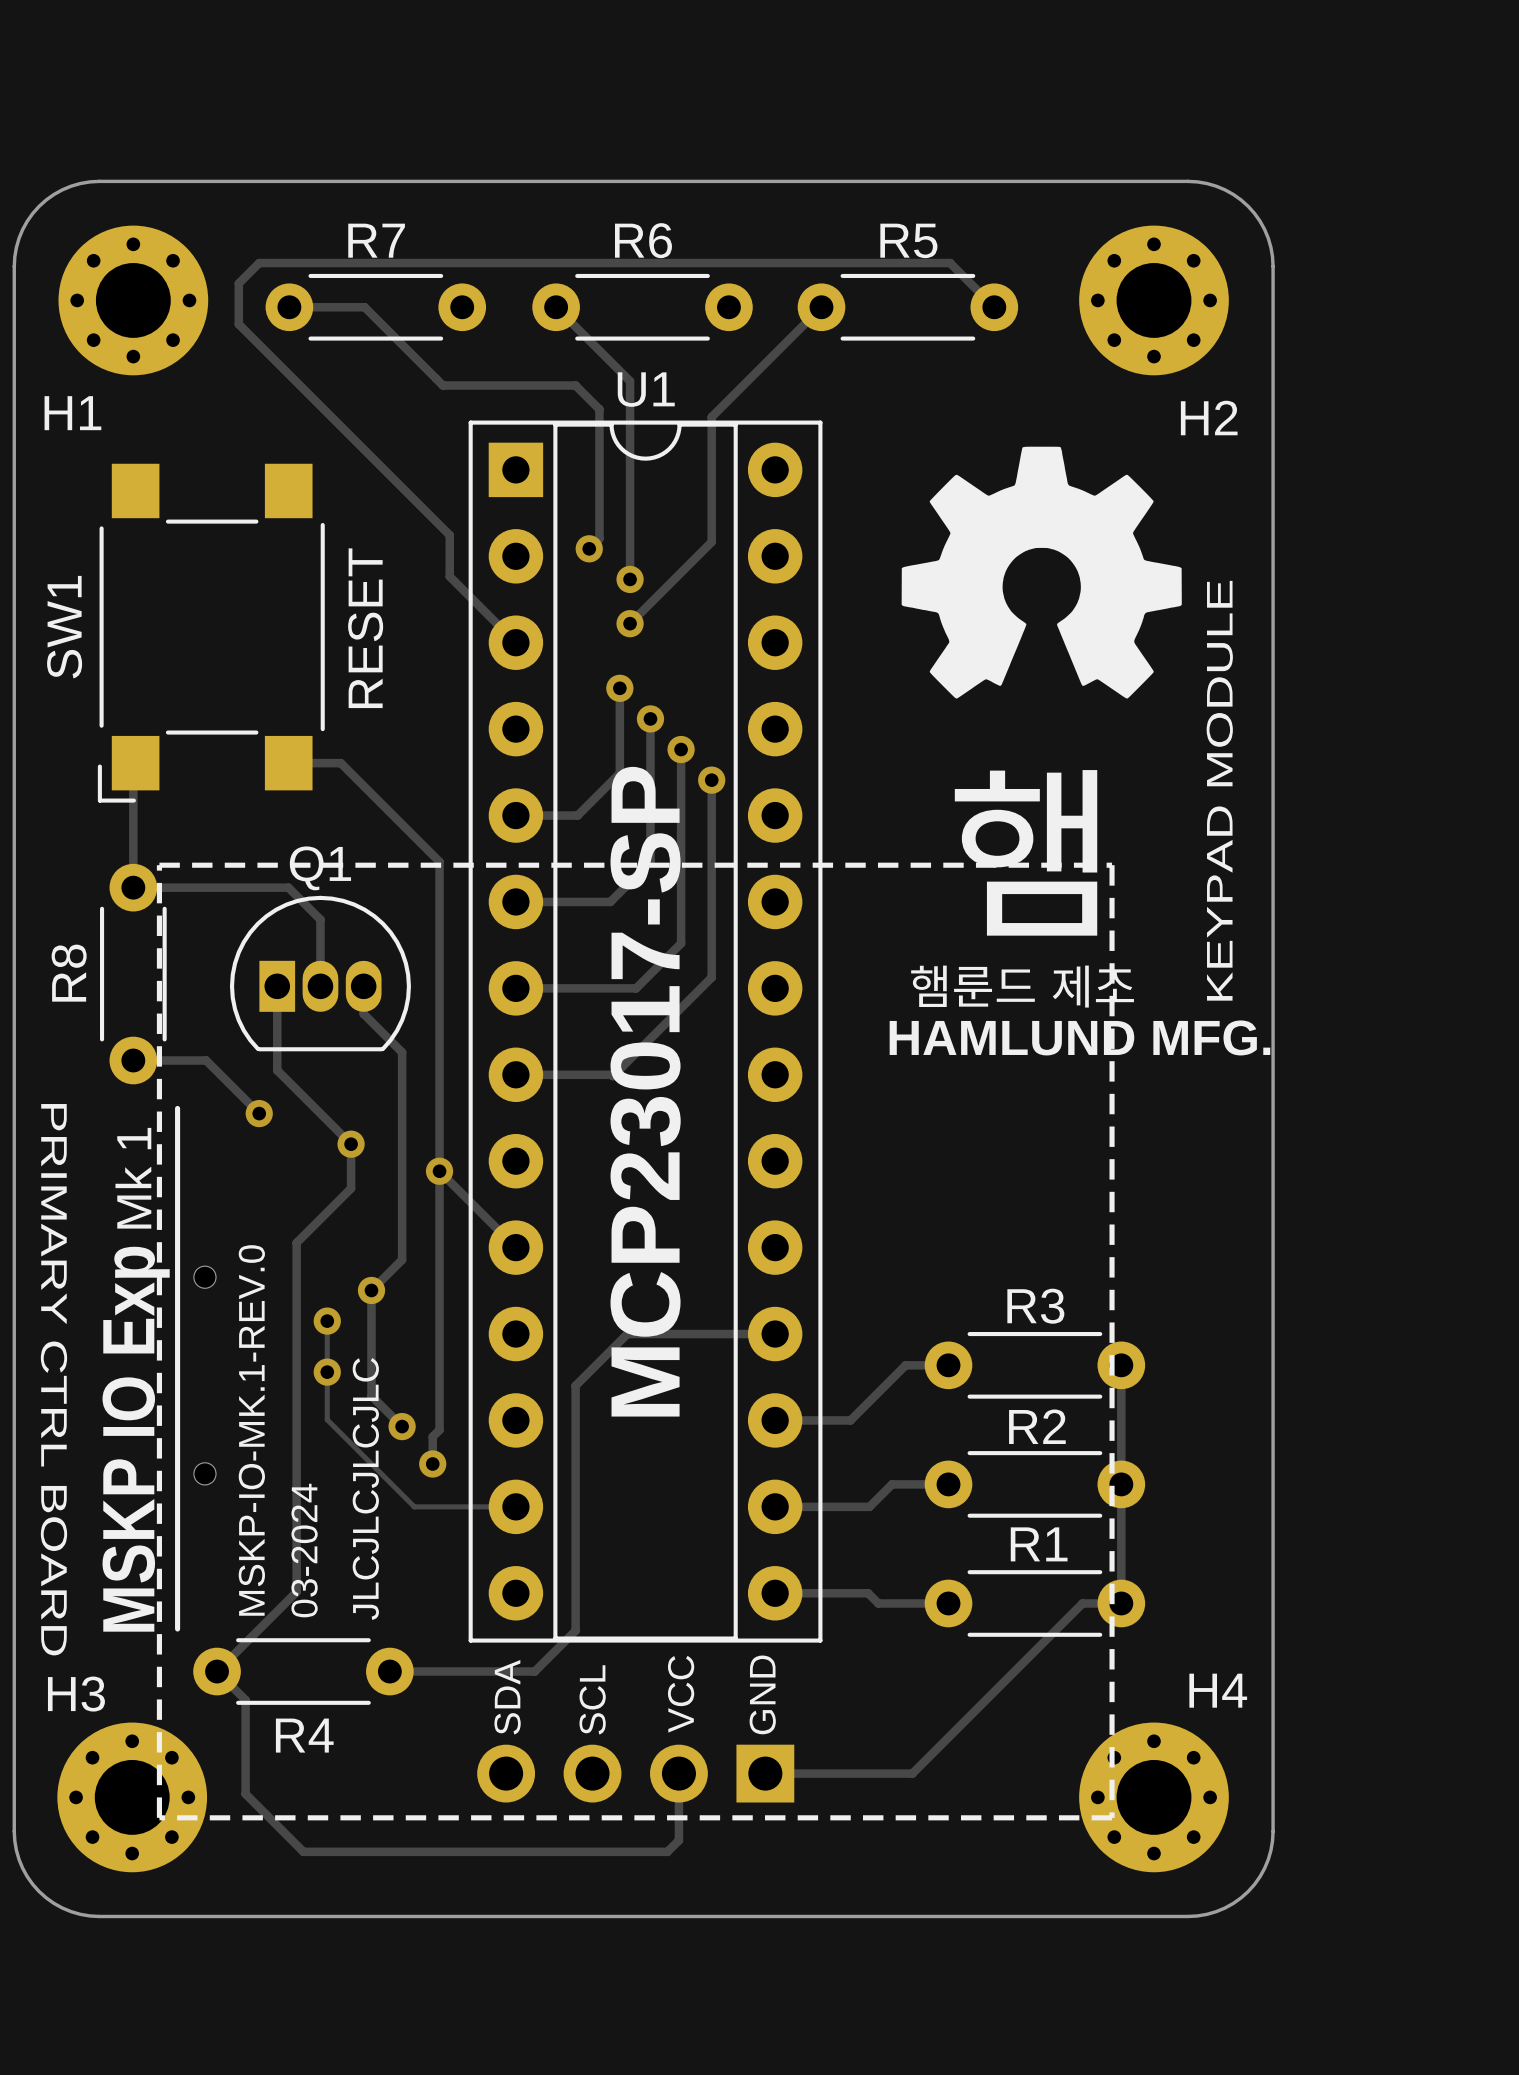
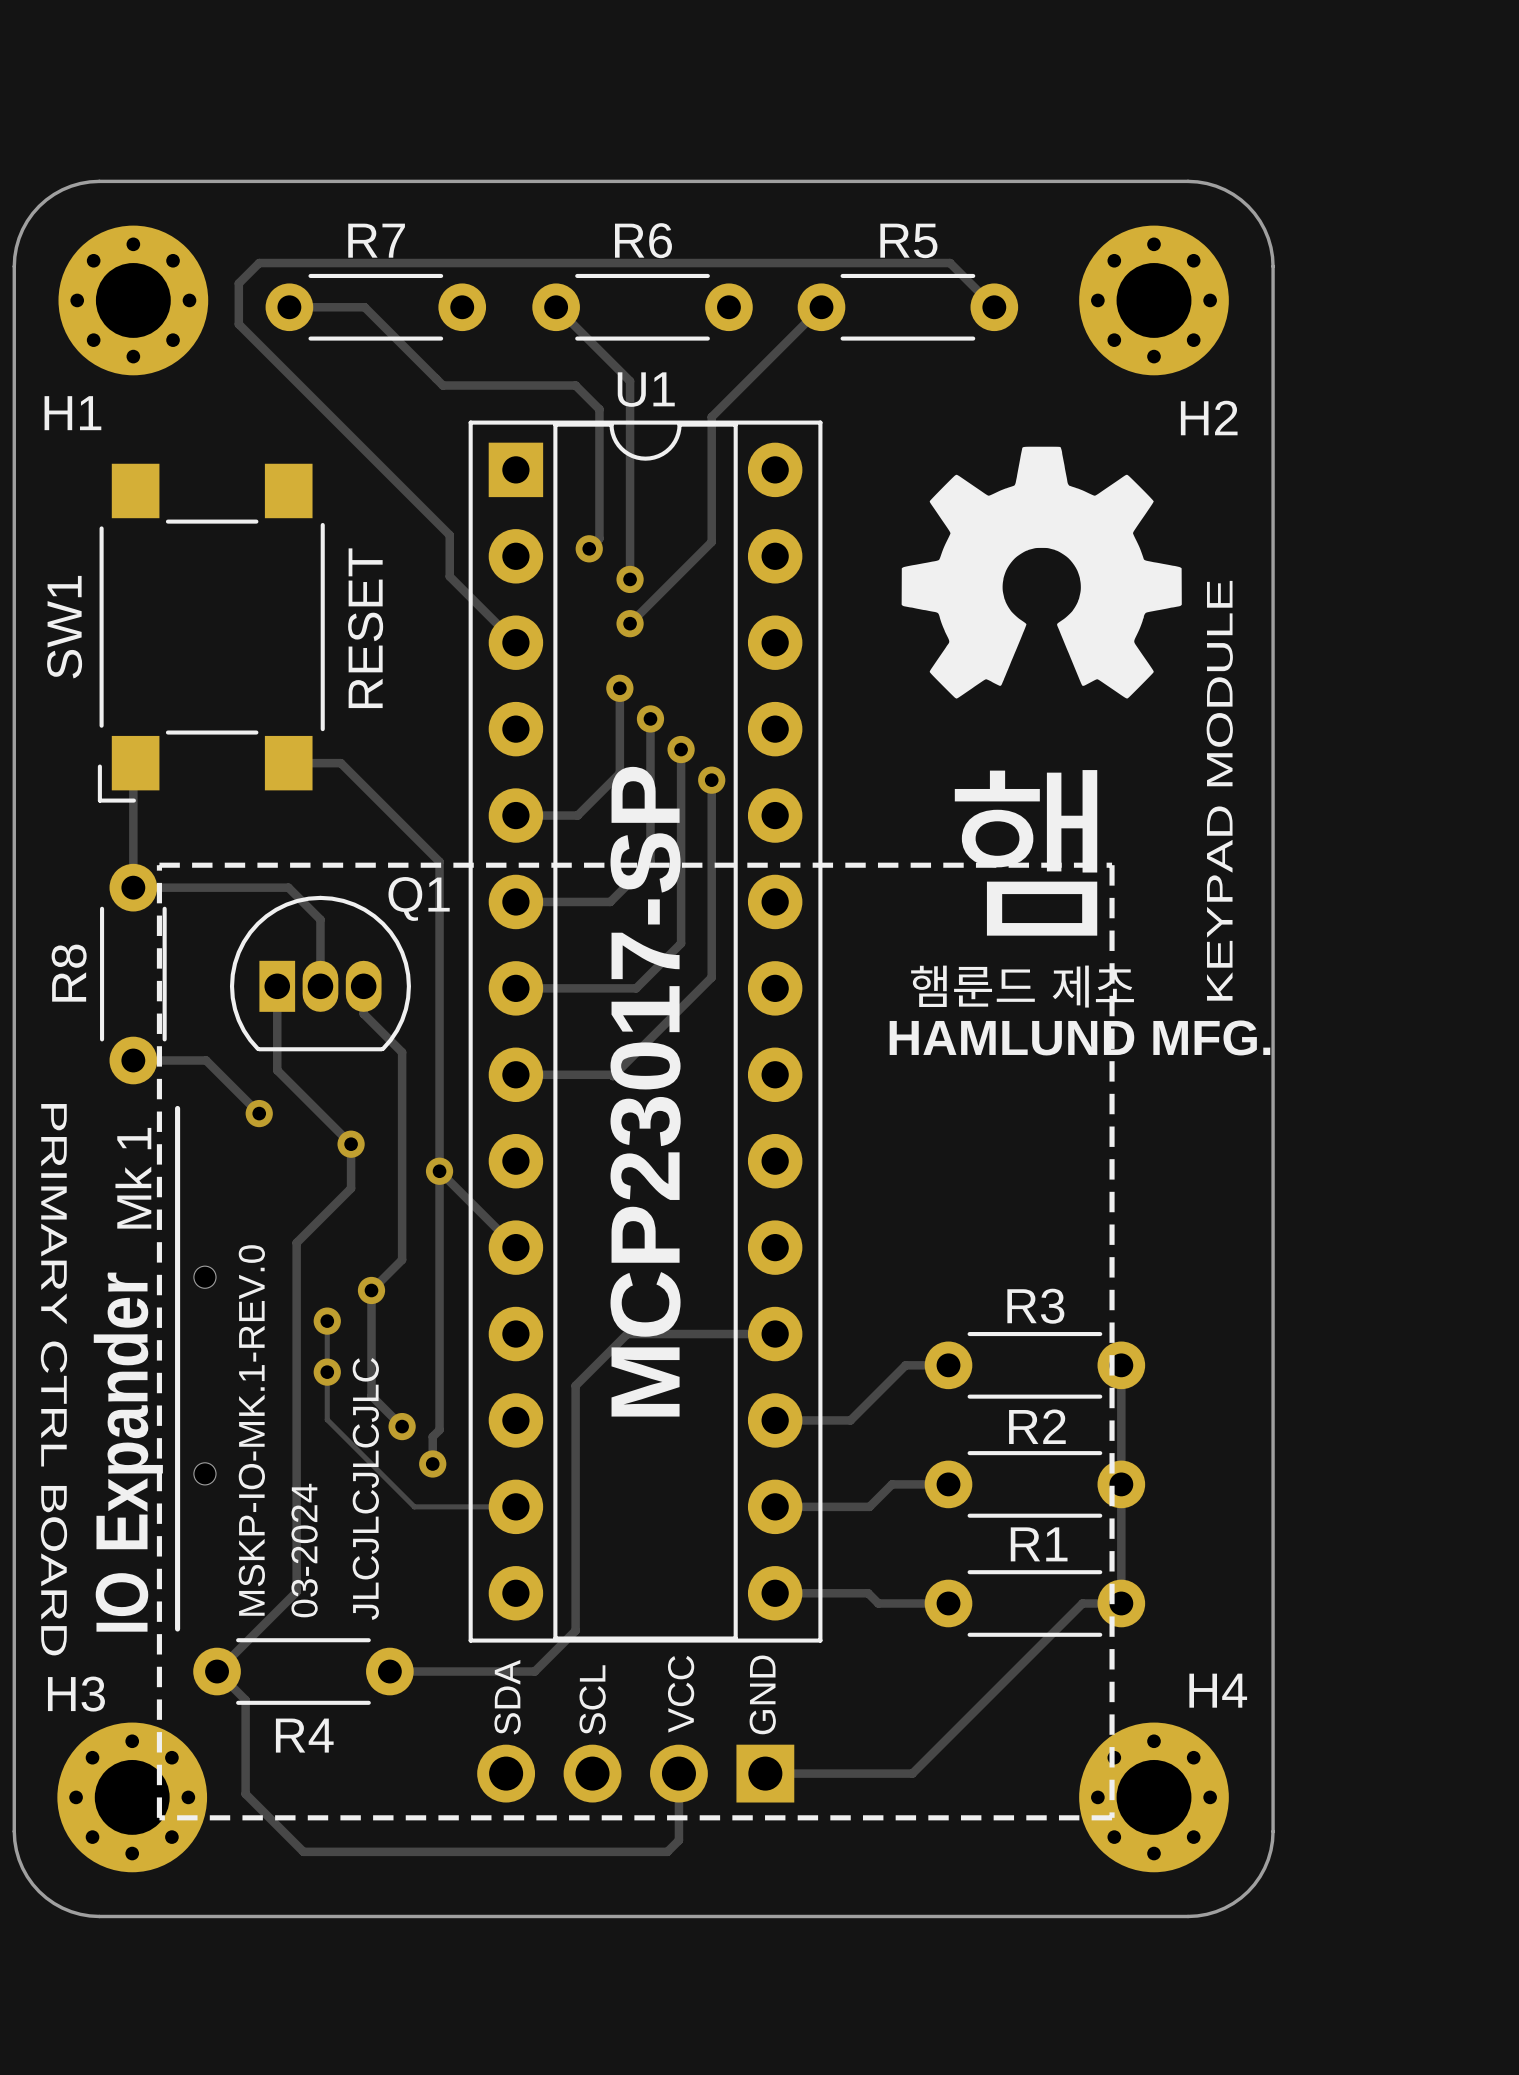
Q1 name position: Q1 (320, 868) -> Q1 (419, 898)
text: MSKP IO Exp (136, 1439) -> IO Expander (128, 1452)

